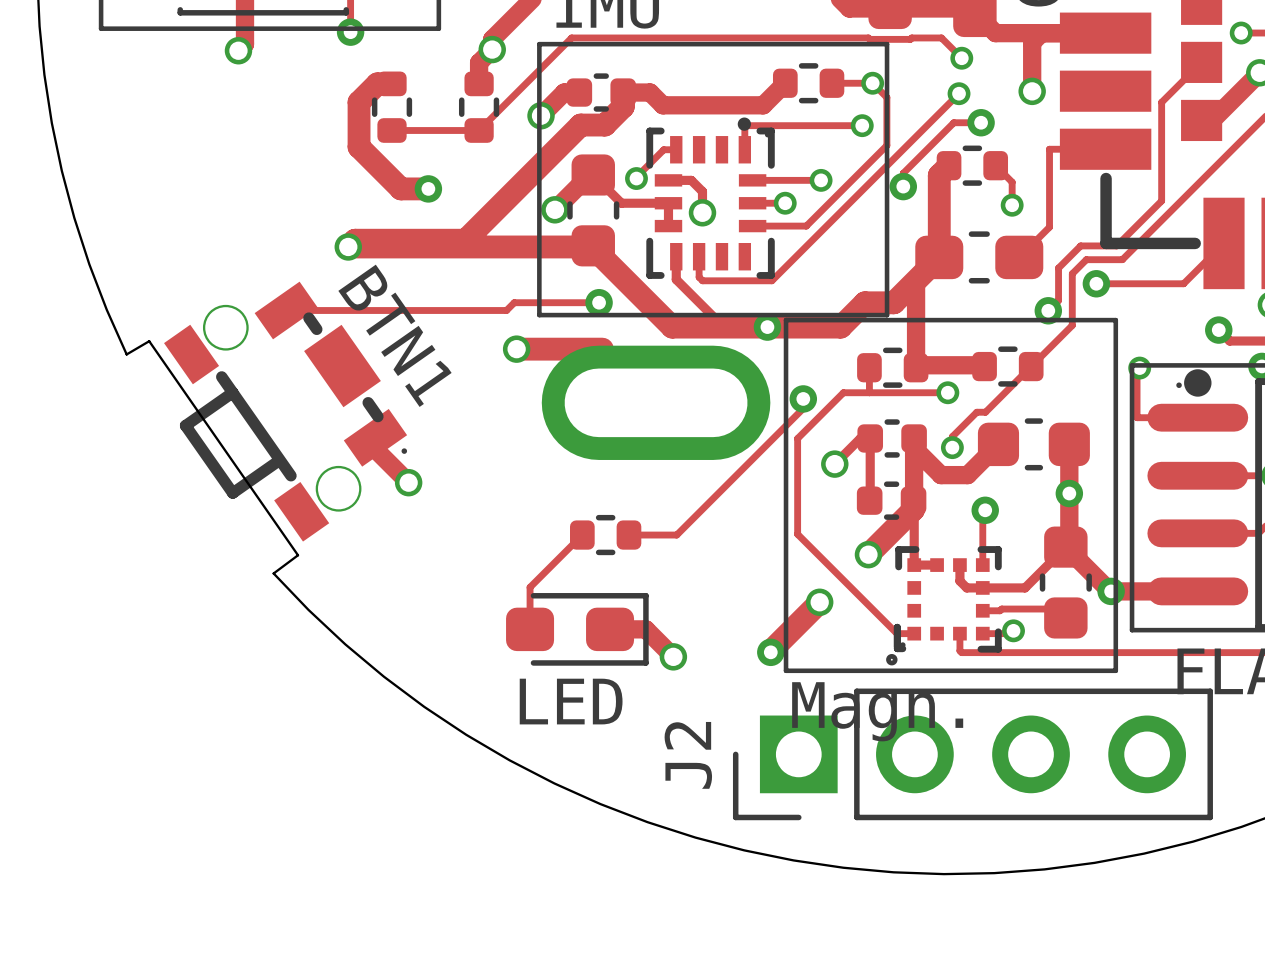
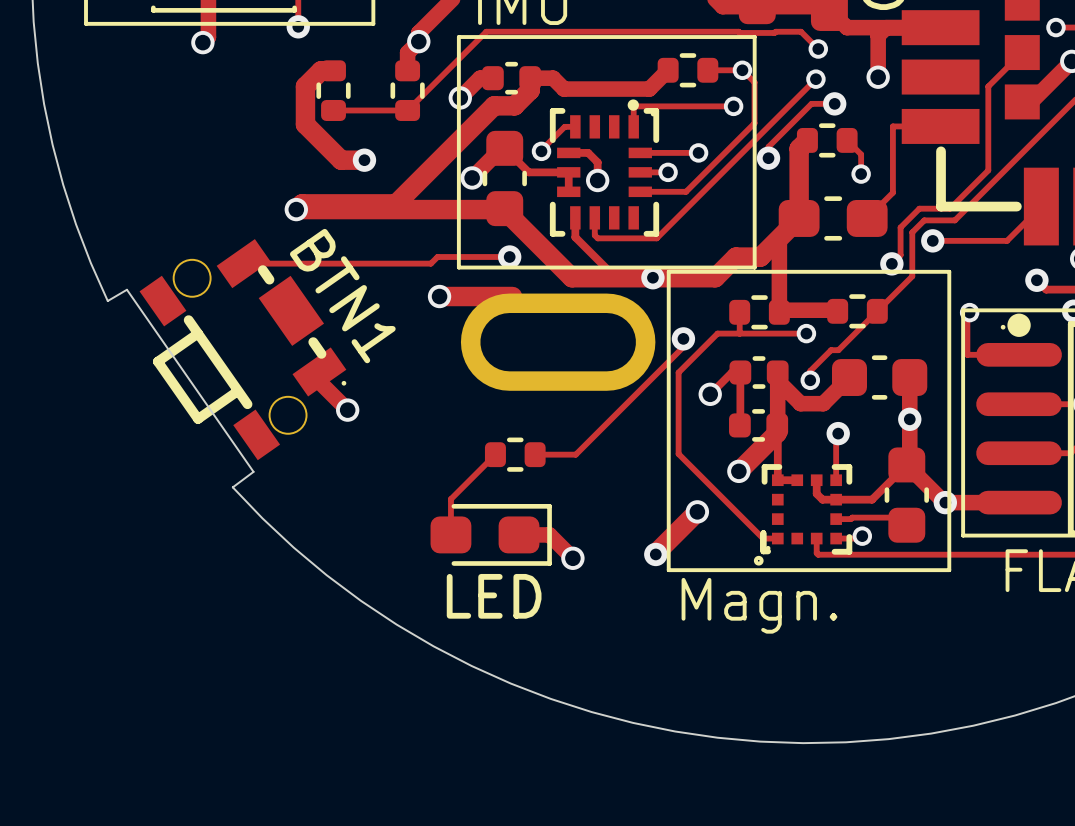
J2: (972, 754) -> none

